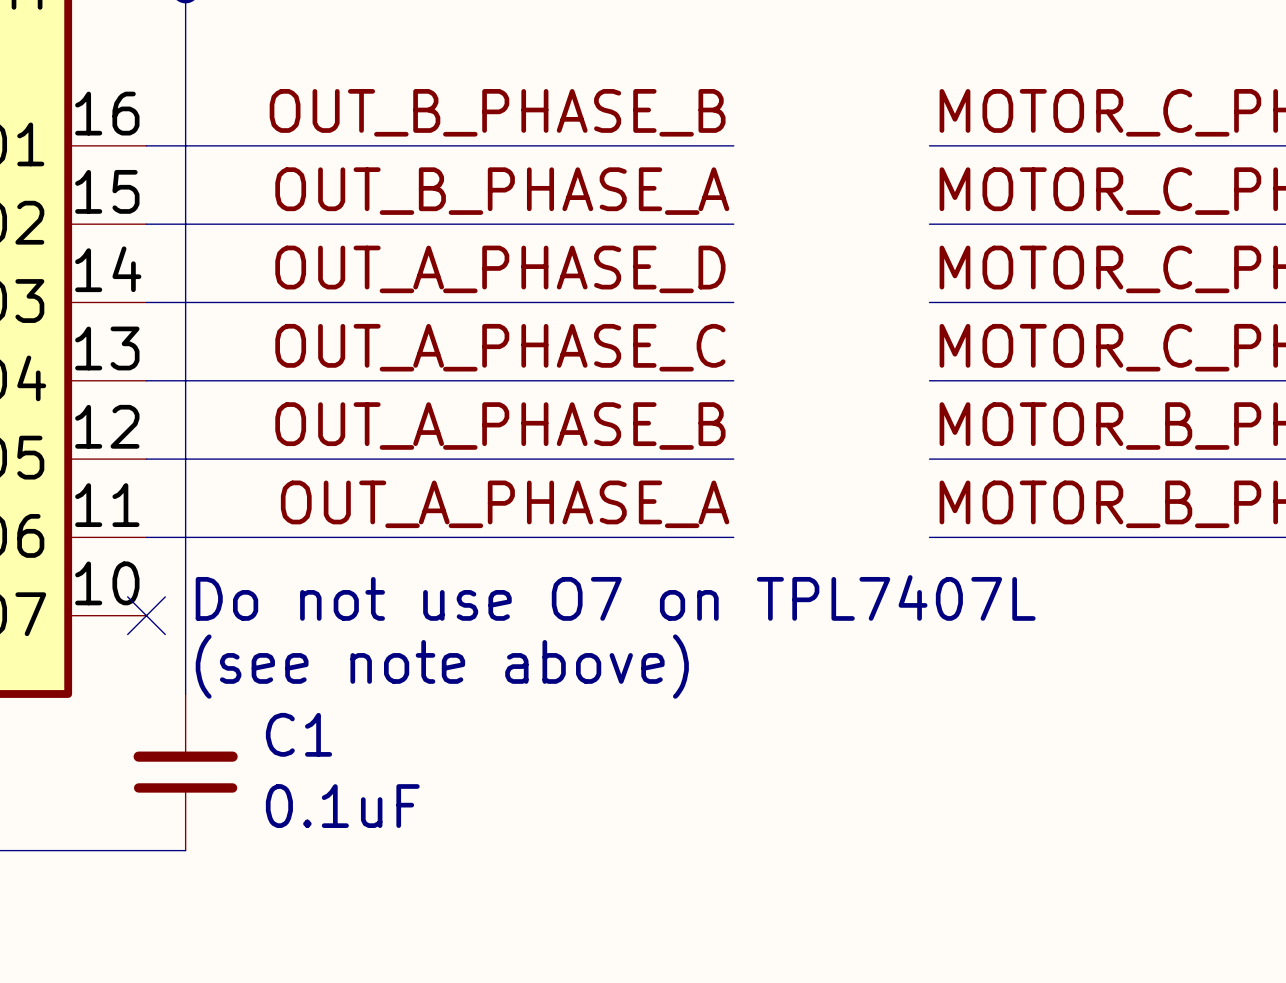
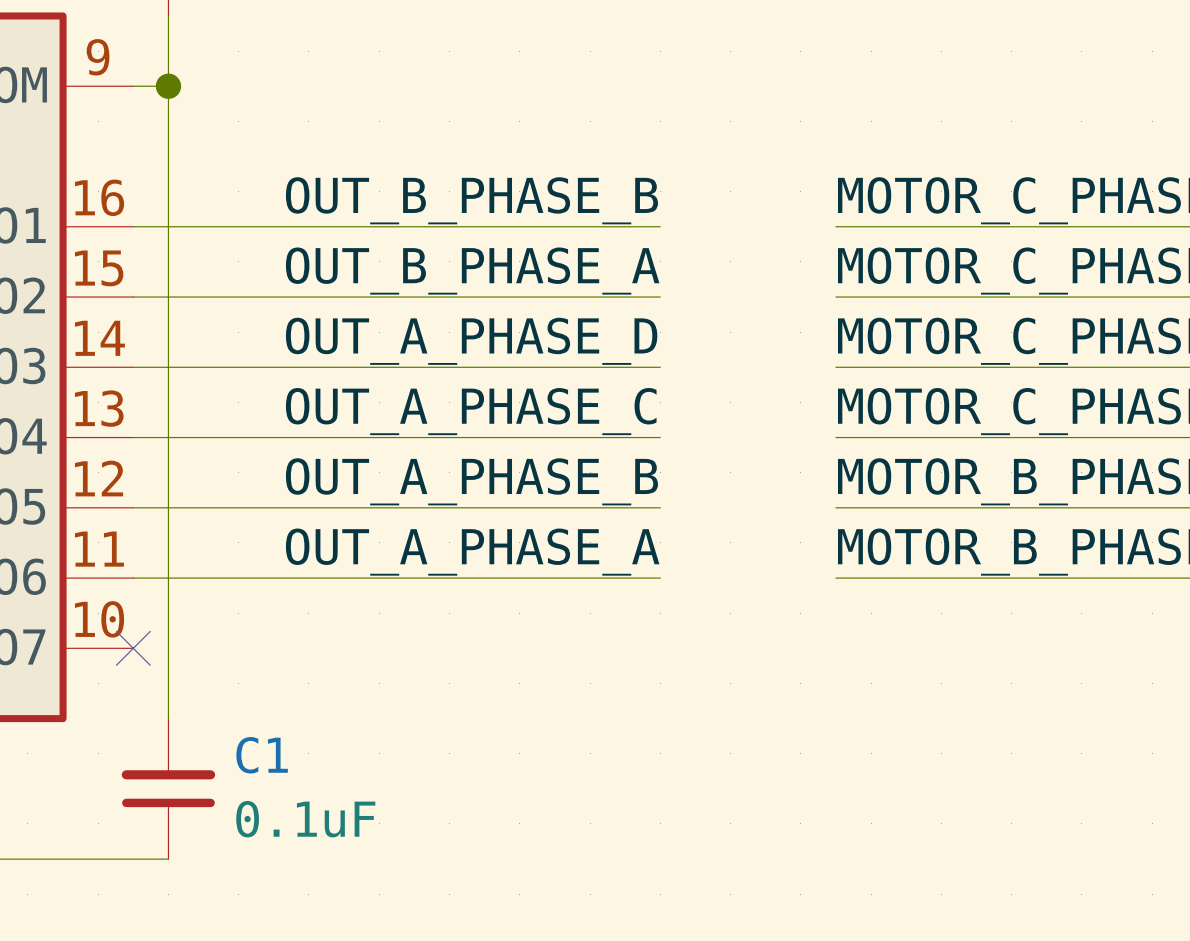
text: Do not use O7 on TPL7407L (615, 597) -> none
text: (see note above) (442, 666) -> none

